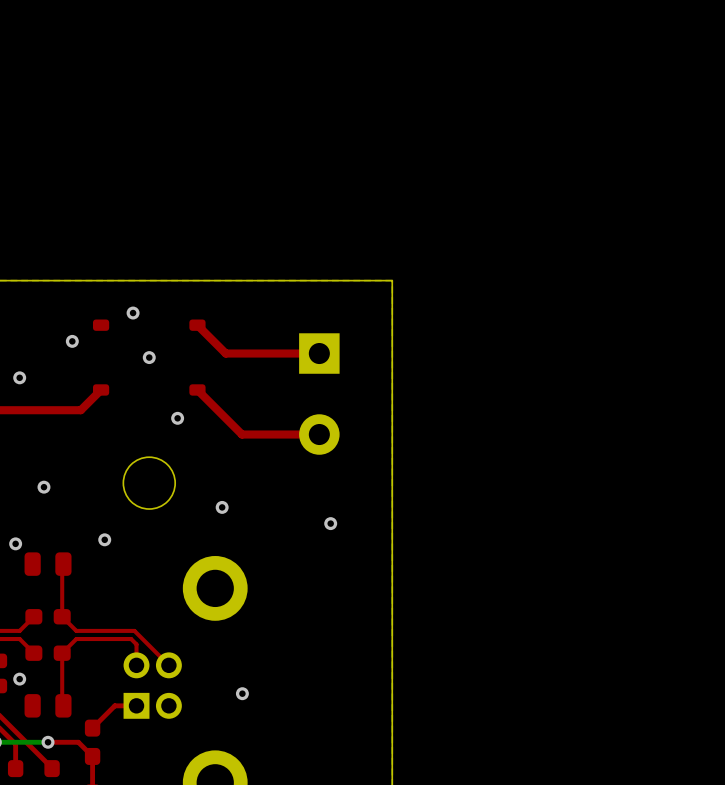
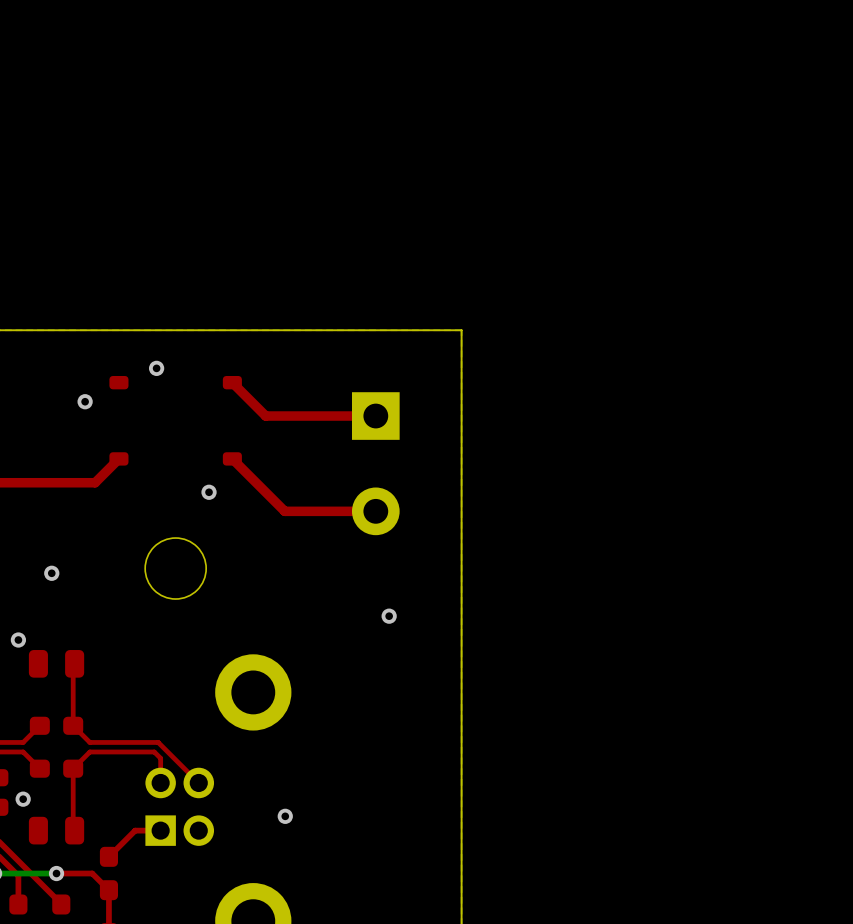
via: (149, 357) -> none
via: (19, 377) -> none
via: (222, 507) -> none
via: (104, 539) -> none

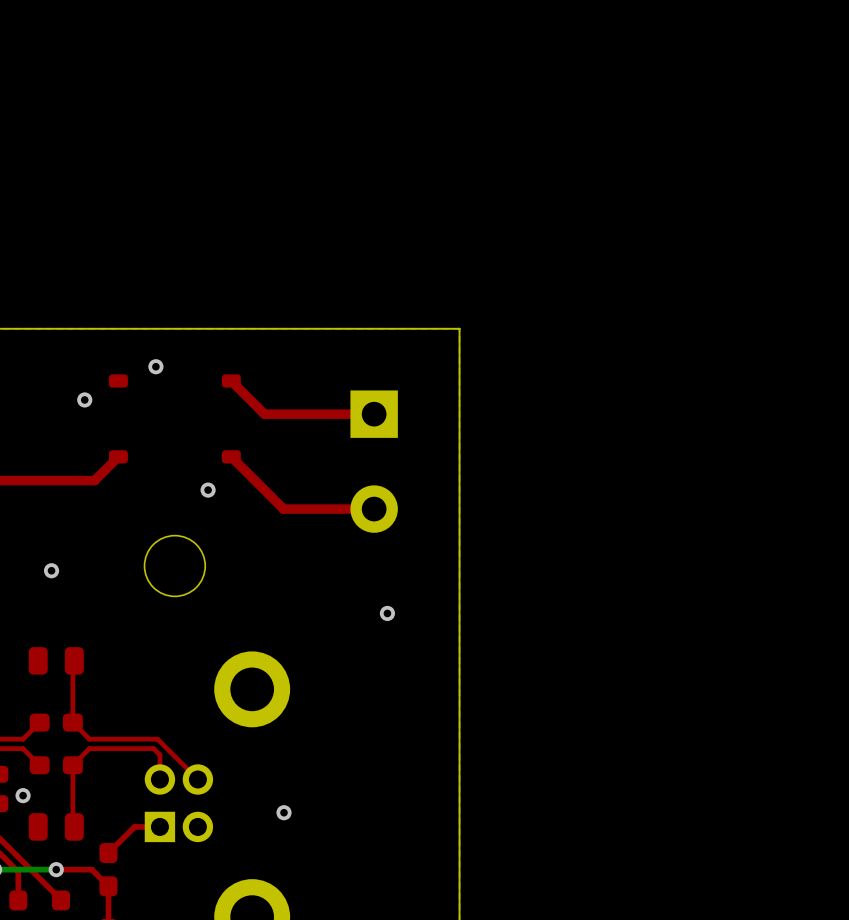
via: (18, 640) -> none

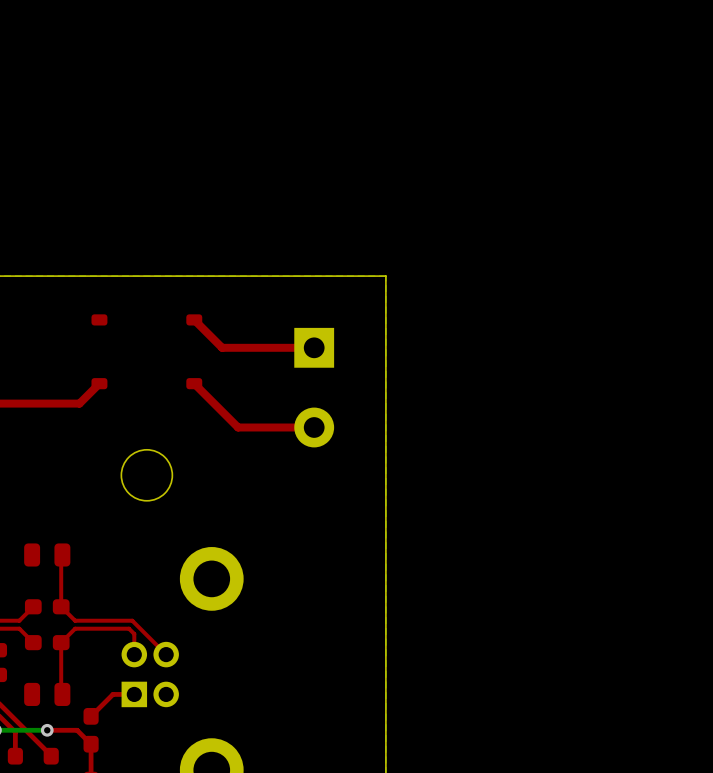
via: (155, 366) -> none
via: (84, 399) -> none
via: (208, 490) -> none
via: (51, 570) -> none
via: (387, 613) -> none
via: (23, 795) -> none
via: (284, 812) -> none

